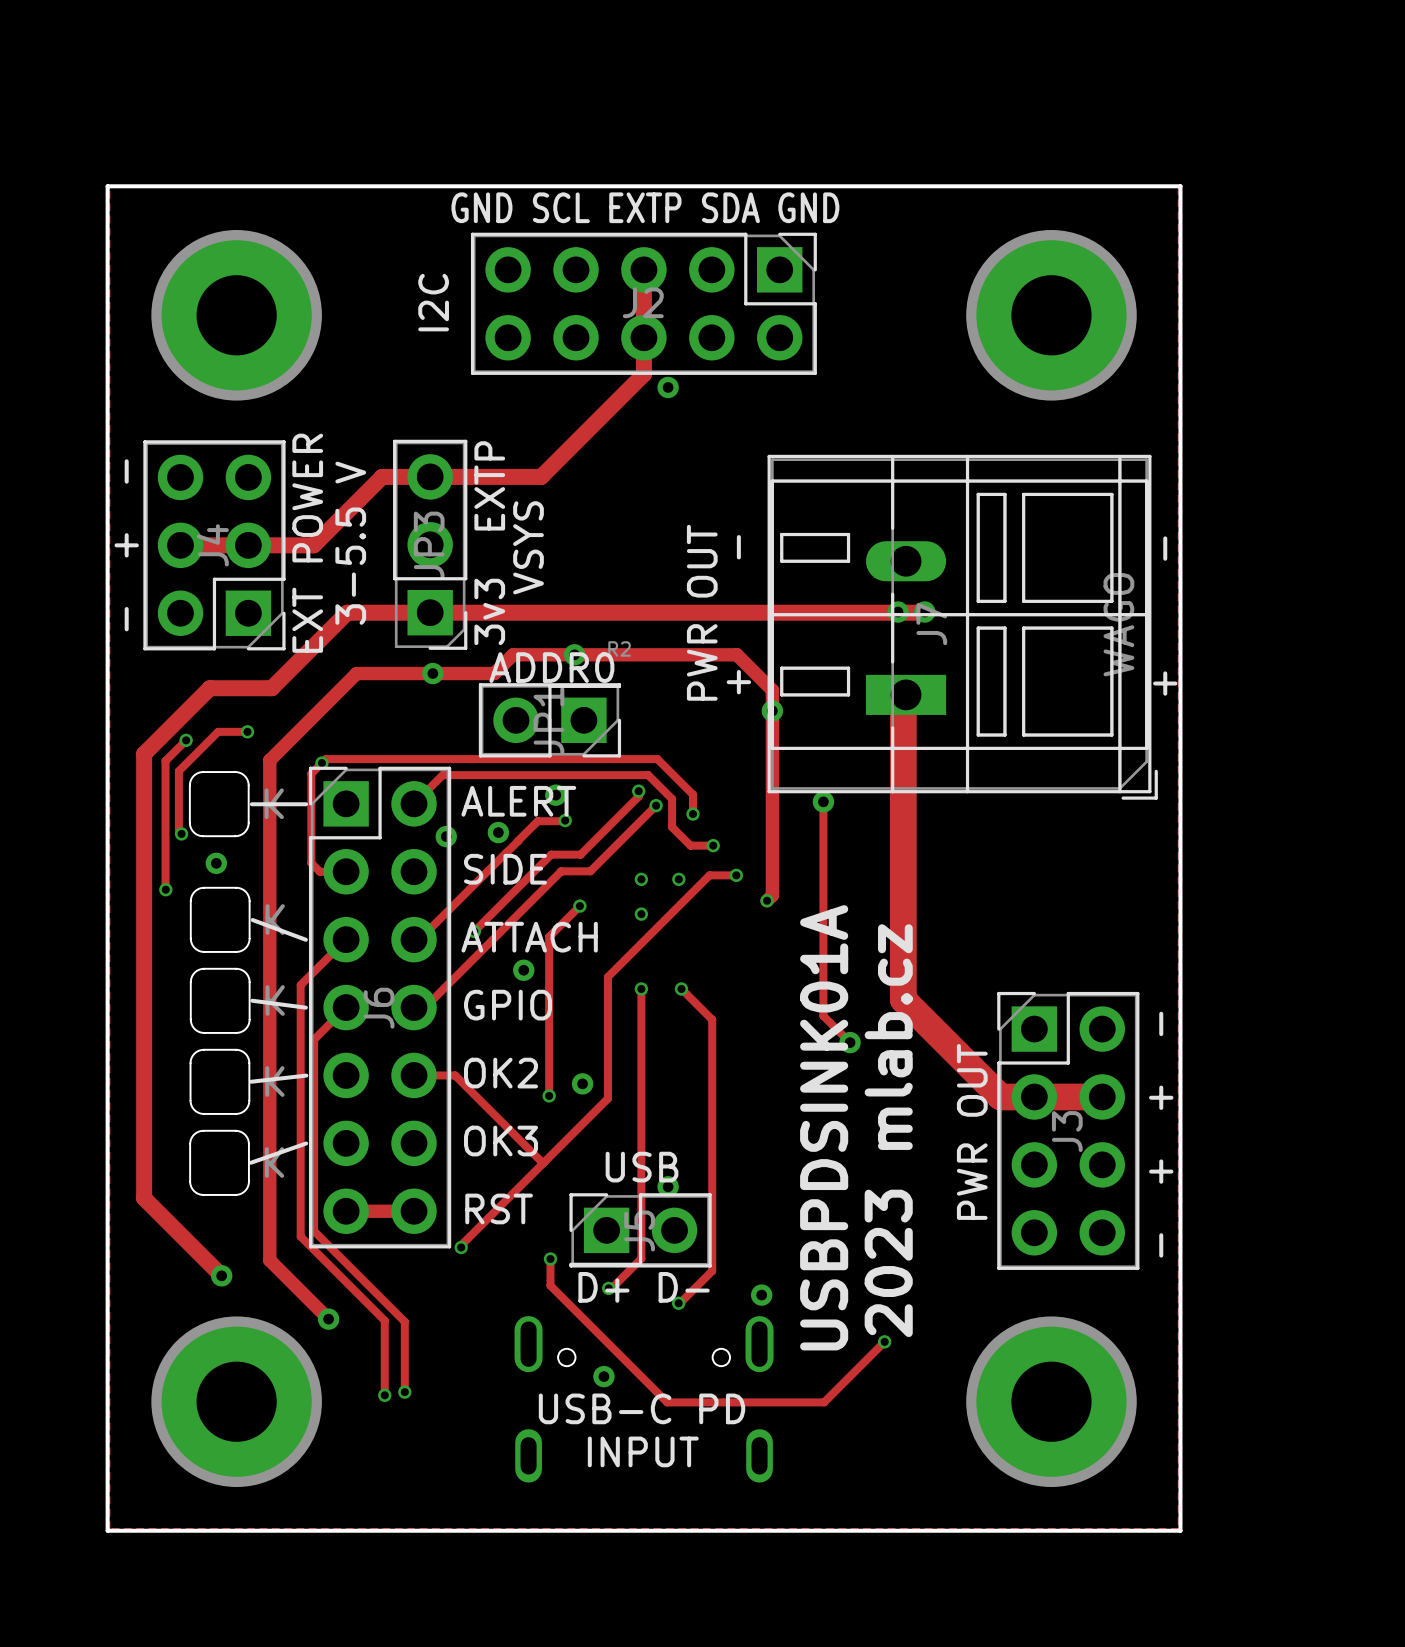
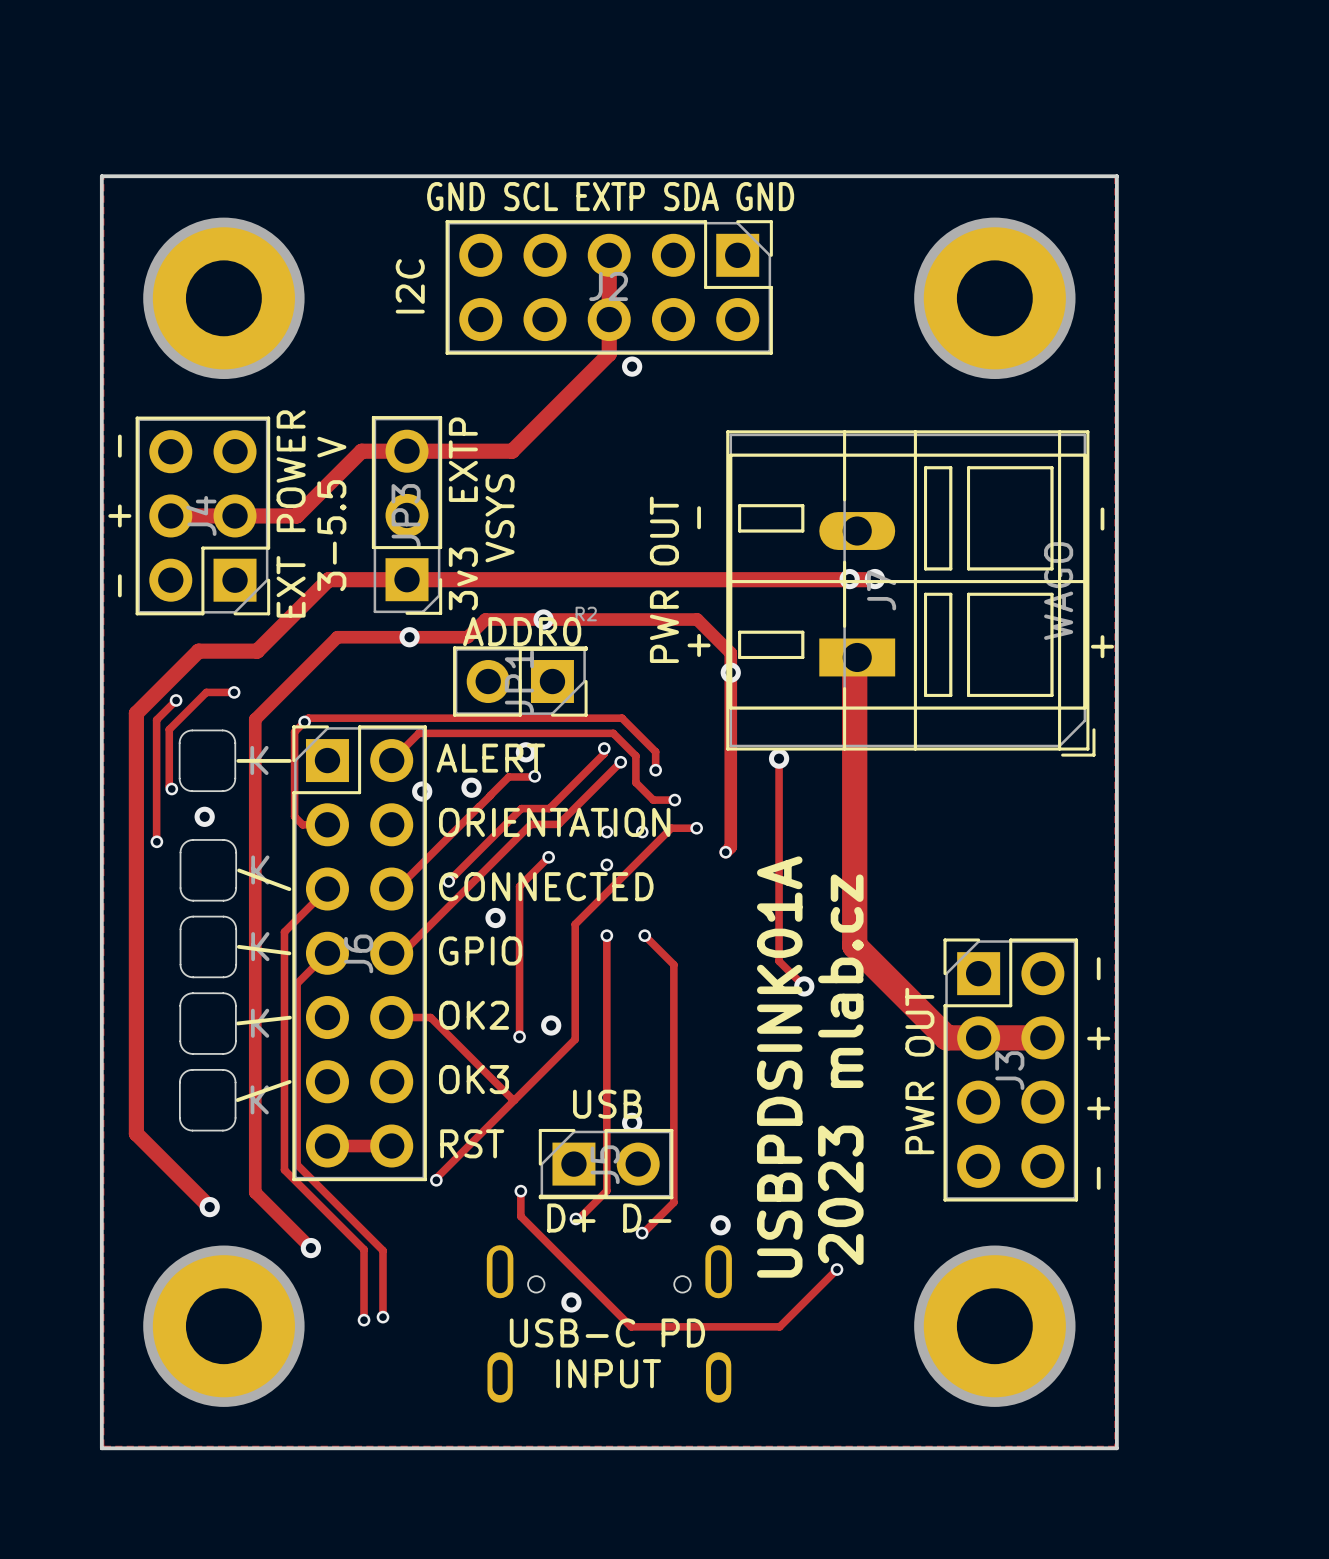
text: SIDE (505, 869) -> ORIENTATION (554, 822)
text: ATTACH (529, 937) -> CONNECTED (546, 886)

